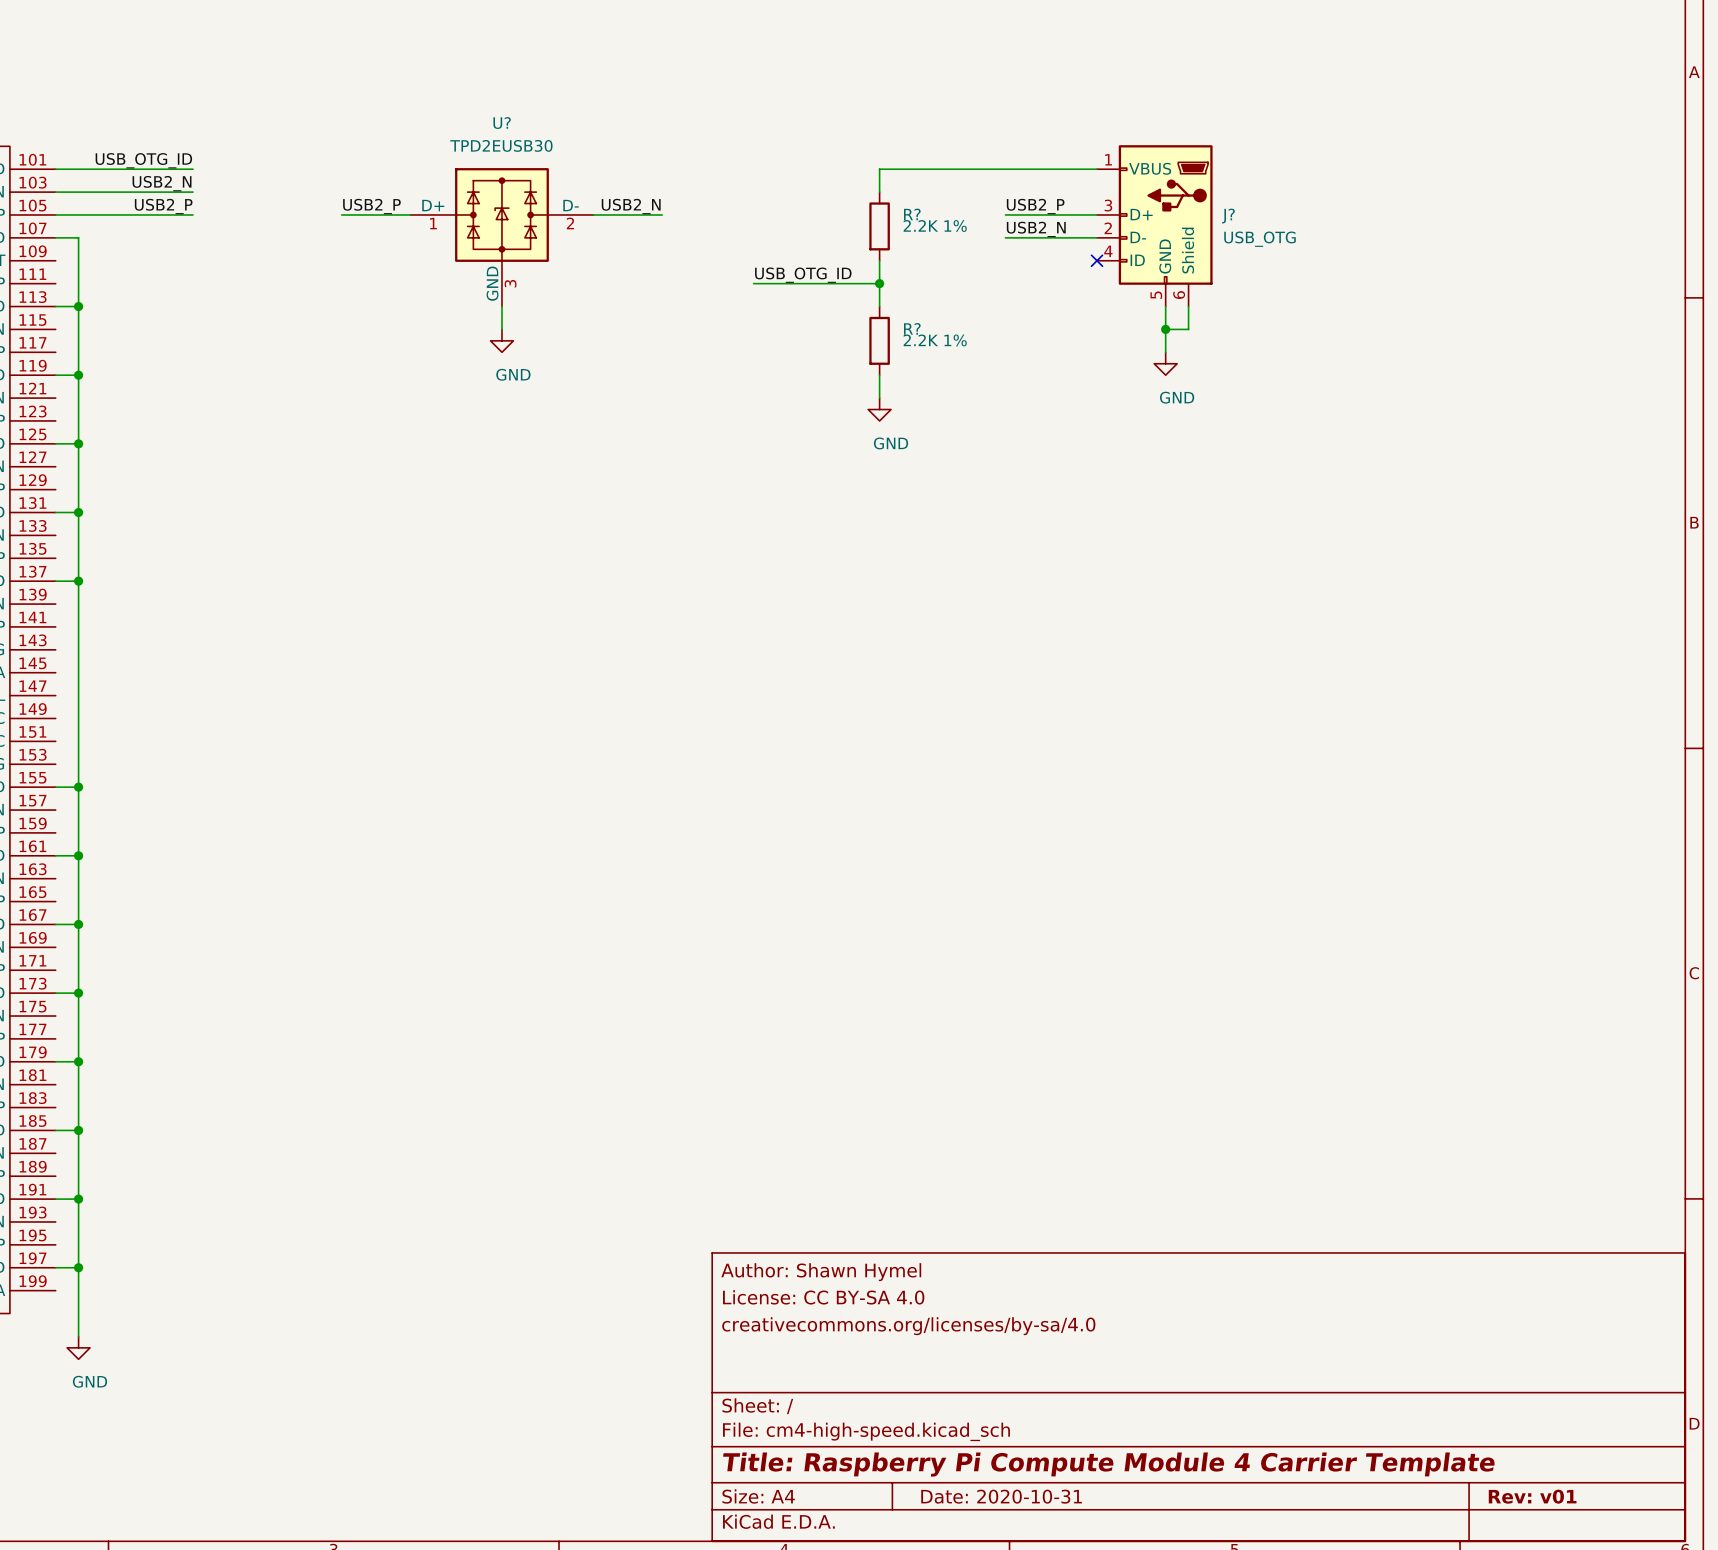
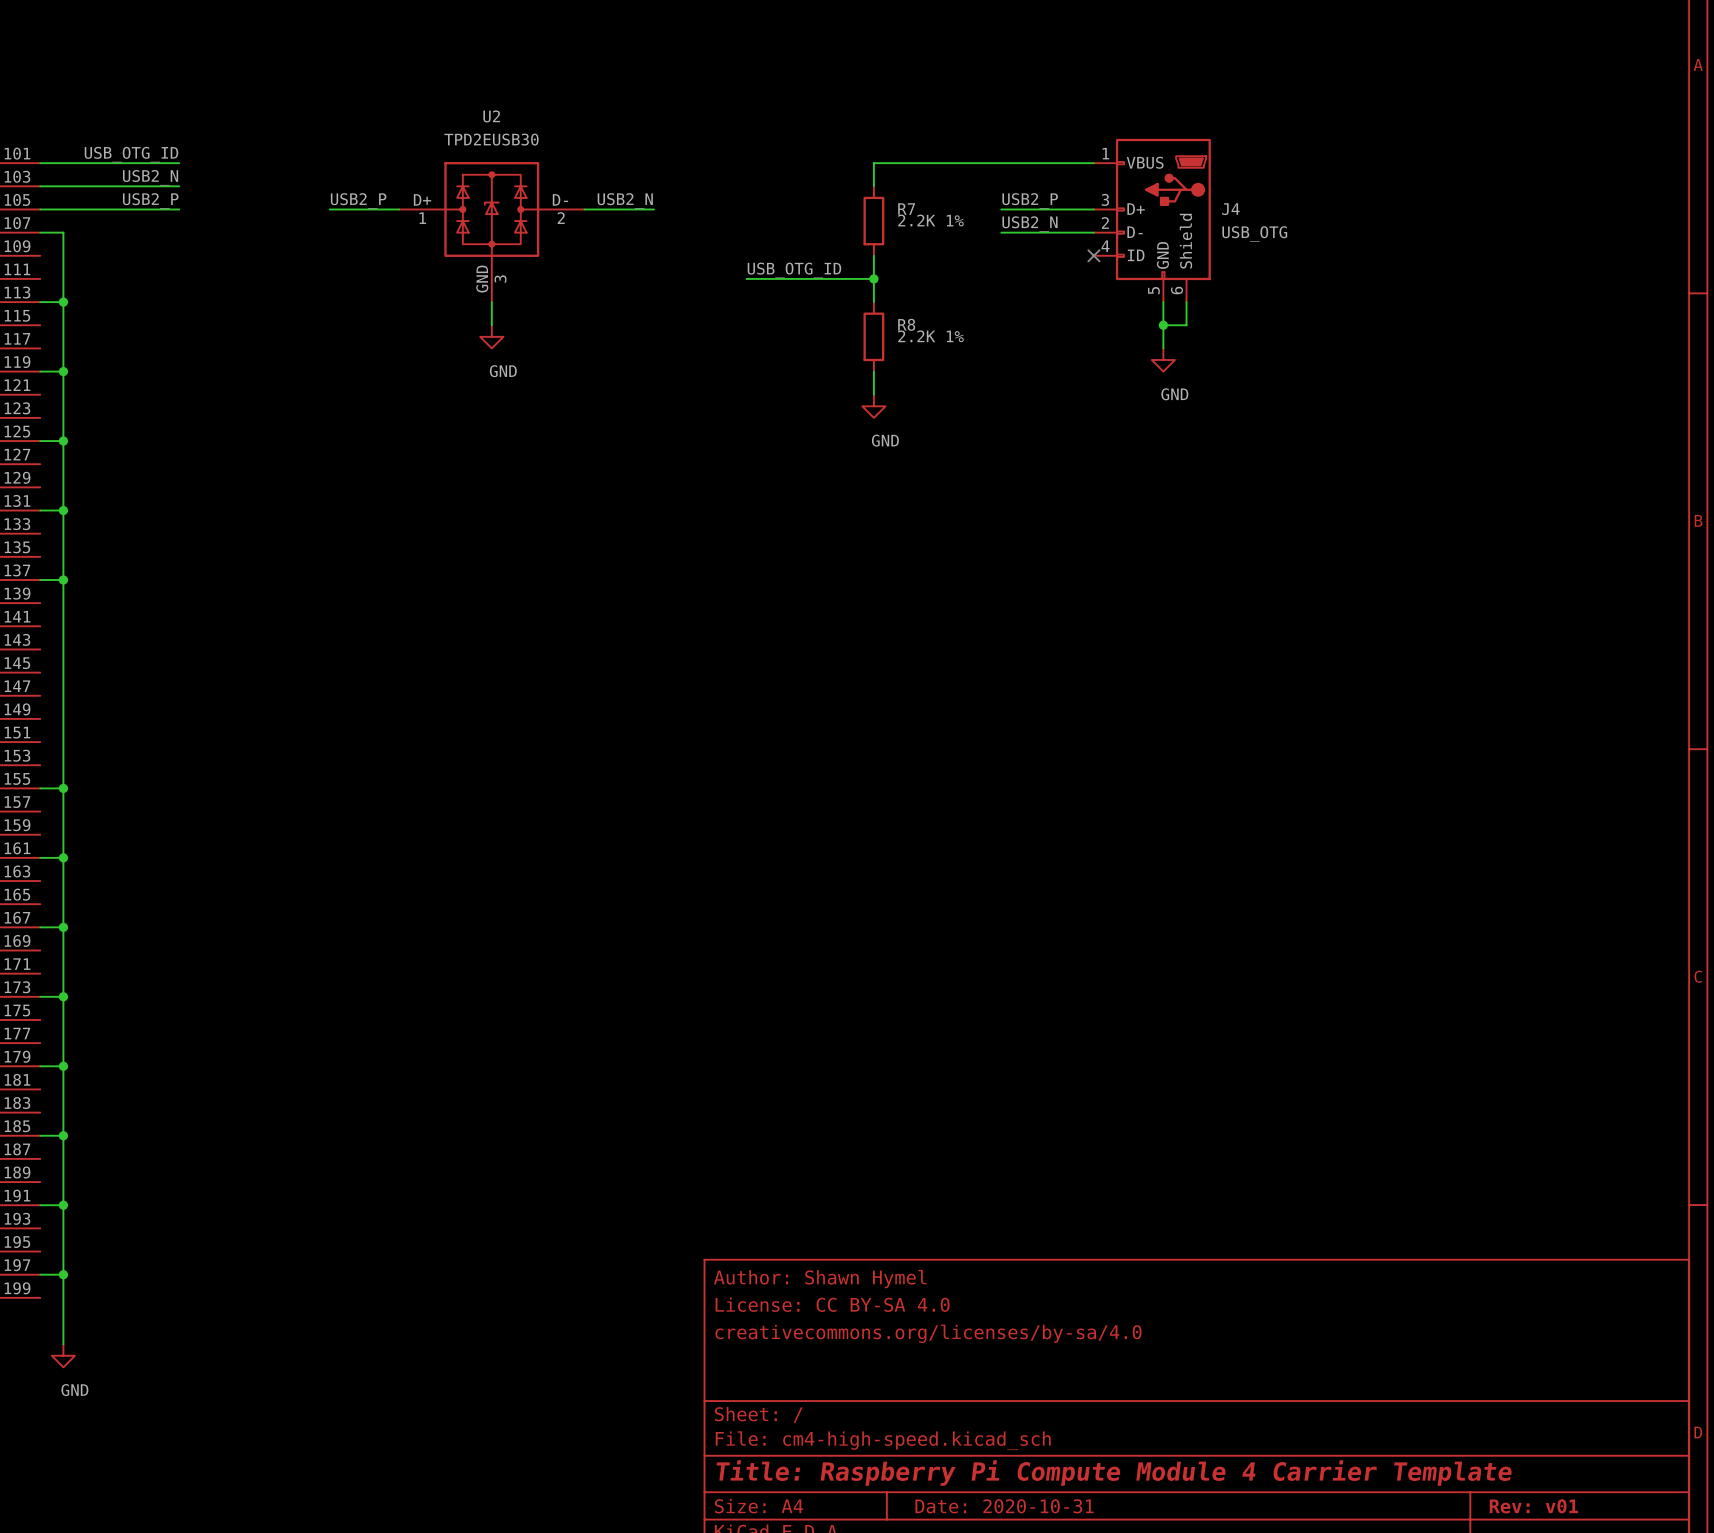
U? name: U? (502, 123) -> U2 (491, 116)
R? name: R? (912, 214) -> R7 (906, 209)
J? name: J? (1228, 216) -> J4 (1230, 209)
R? name: R? (912, 328) -> R8 (906, 324)

